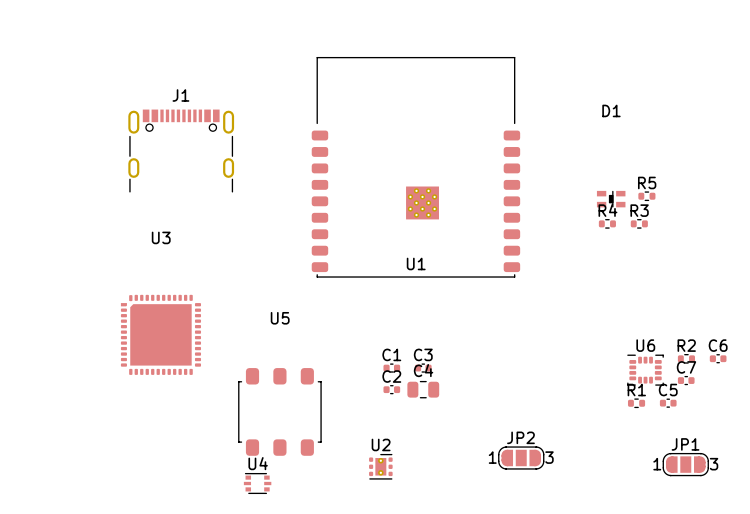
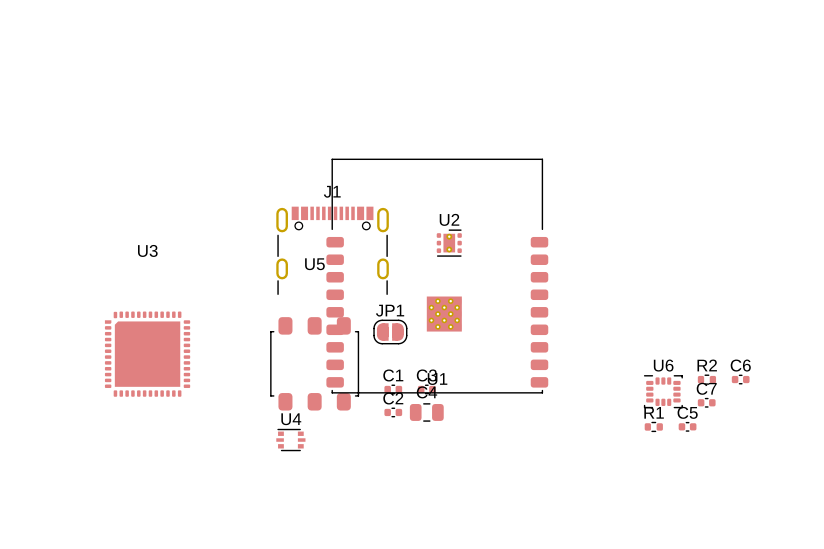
J1 position: (181, 151) -> (332, 250)
U1 position: (415, 167) -> (437, 276)
R5: (646, 196) -> none
D1: (611, 199) -> none
R4: (607, 223) -> none
R3: (639, 223) -> none
U5 position: (279, 411) -> (314, 363)
JP1 footprint: [662, 452, 709, 477] -> [373, 319, 408, 345]
JP2: (521, 458) -> none
U2 position: (380, 466) -> (449, 243)
U4 position: (257, 483) -> (290, 440)

